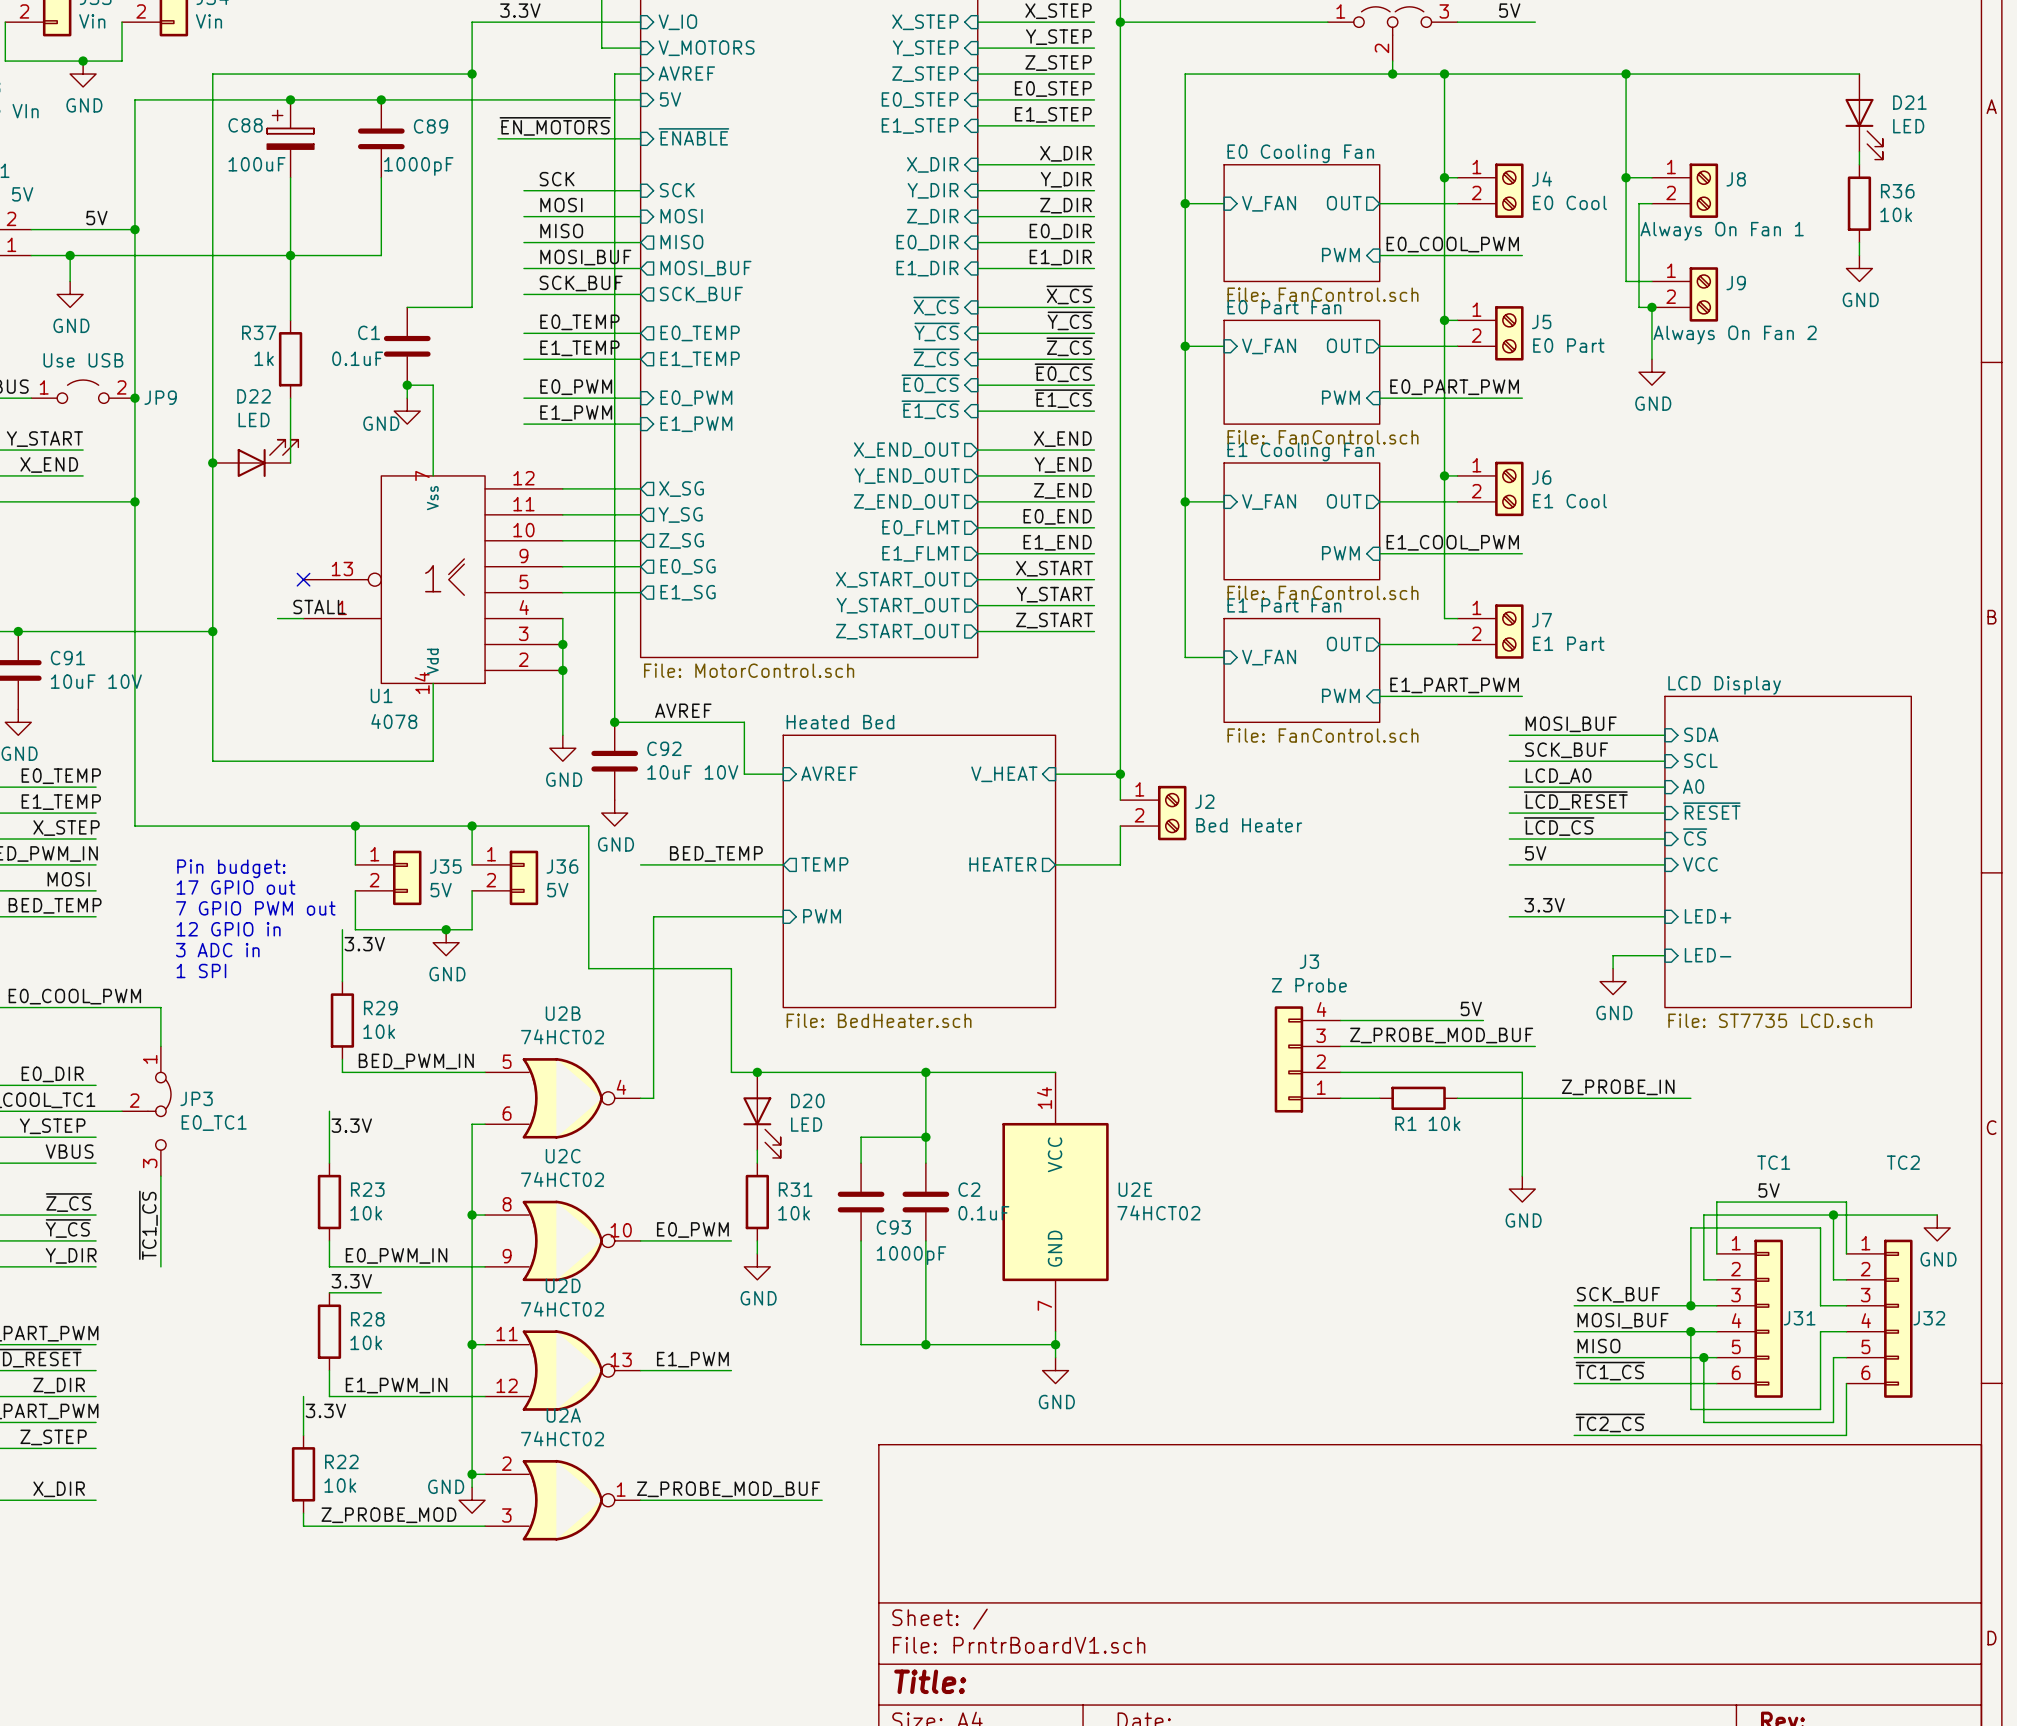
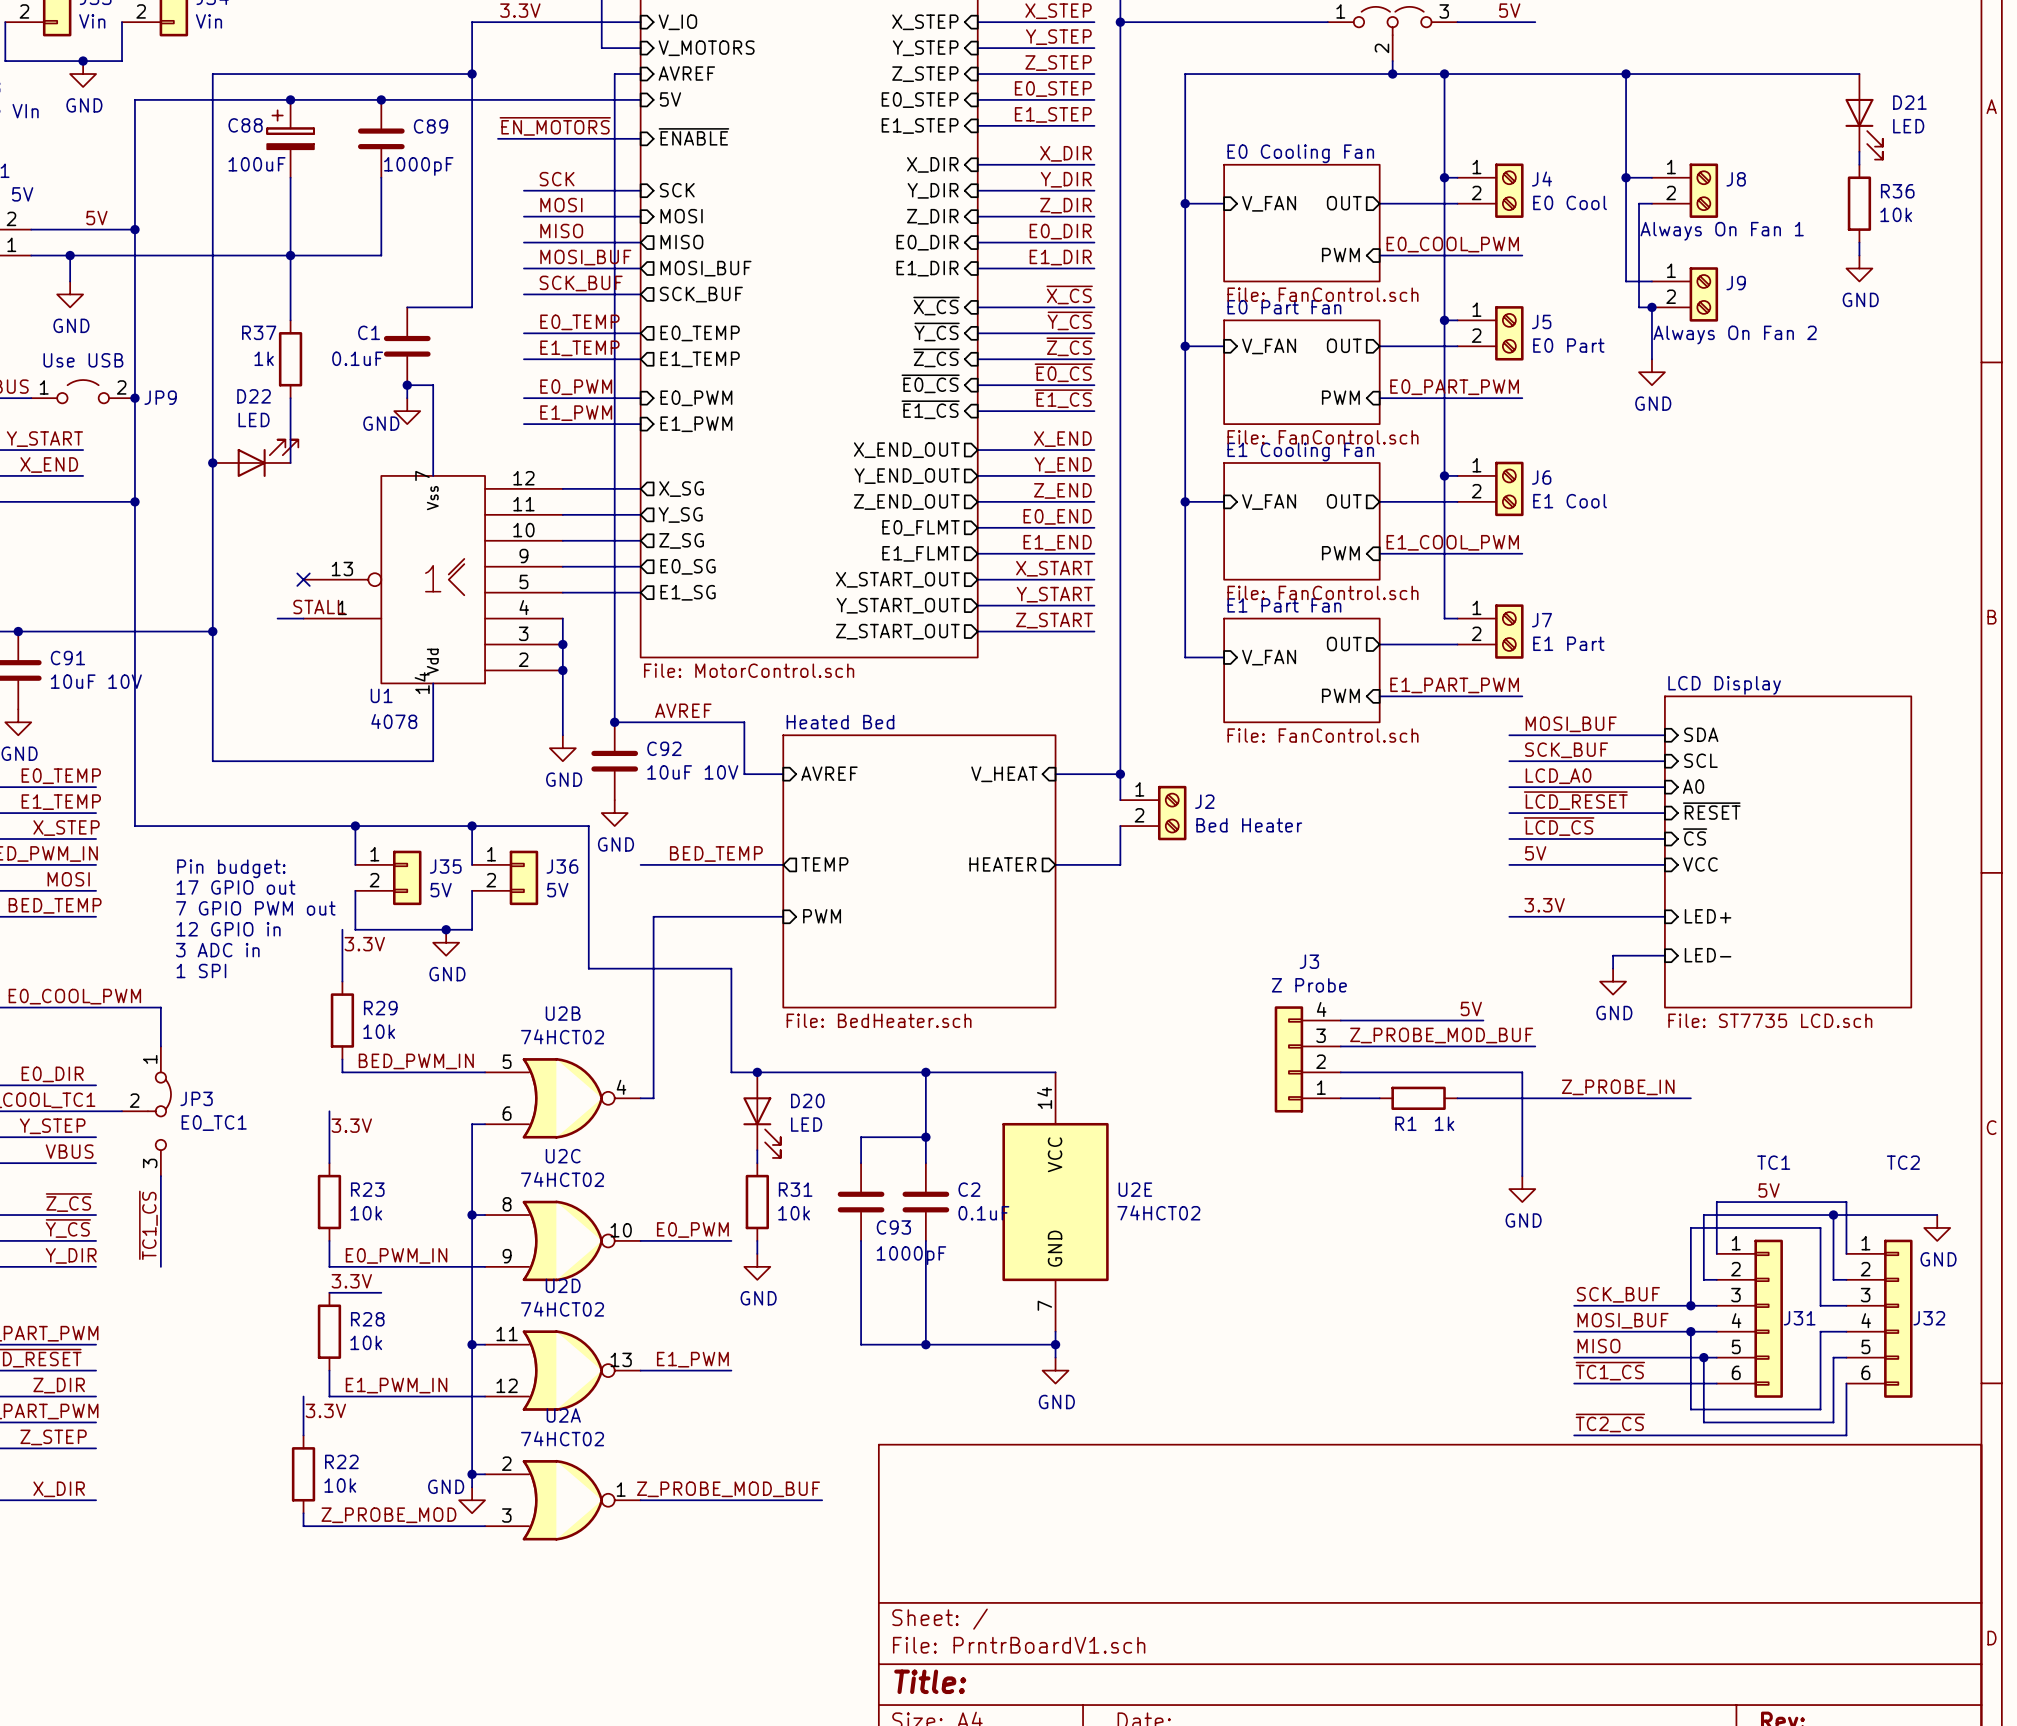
R1 value: 10k (1444, 1123) -> 1k (1444, 1123)

